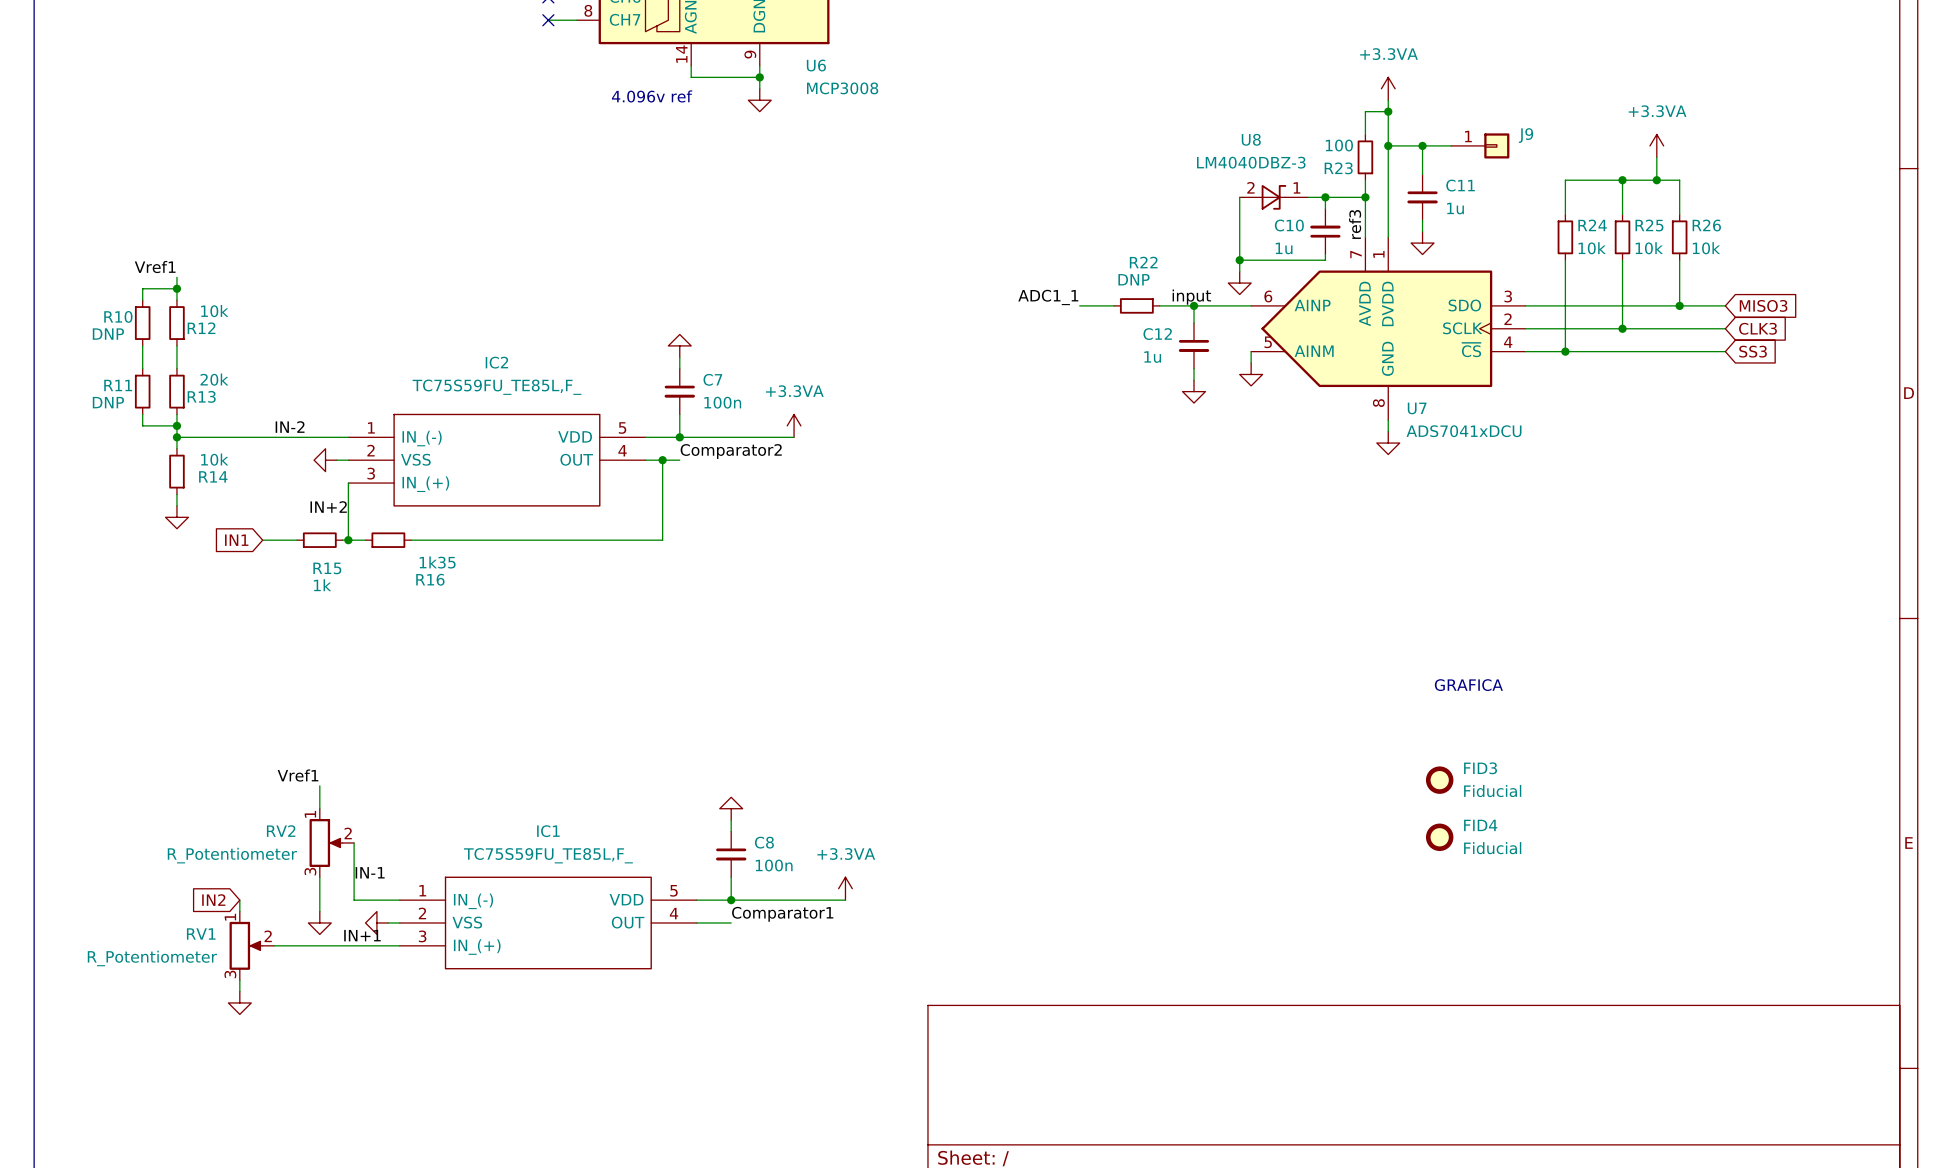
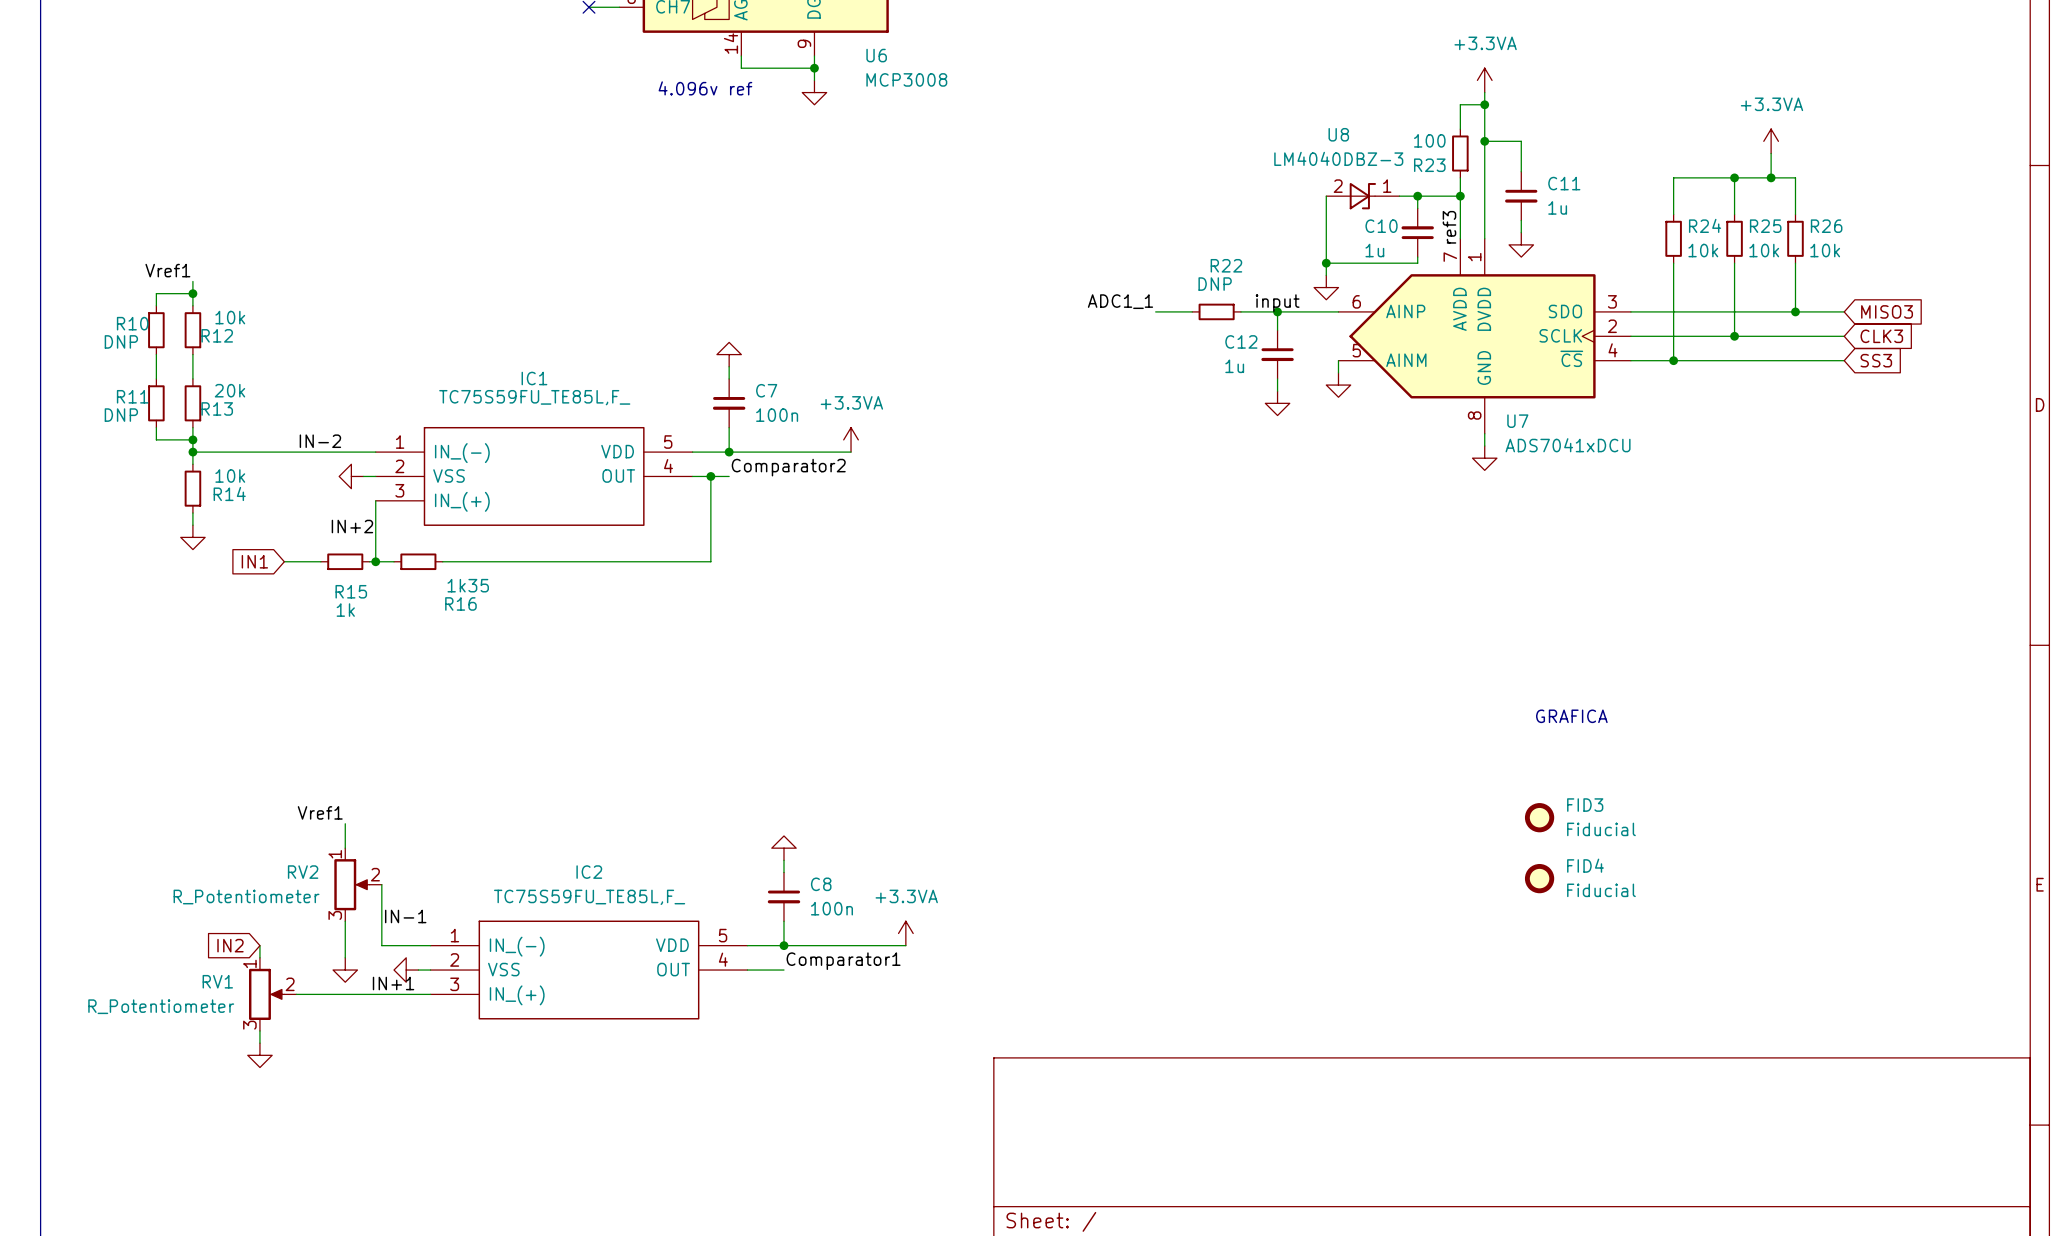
wire: (1422, 145) (1451, 145) -> none
junction: (1422, 145) -> none
J9: (1480, 145) -> none
IC2 name: IC2 (496, 362) -> IC1 (534, 378)
IC1 name: IC1 (548, 831) -> IC2 (589, 872)

